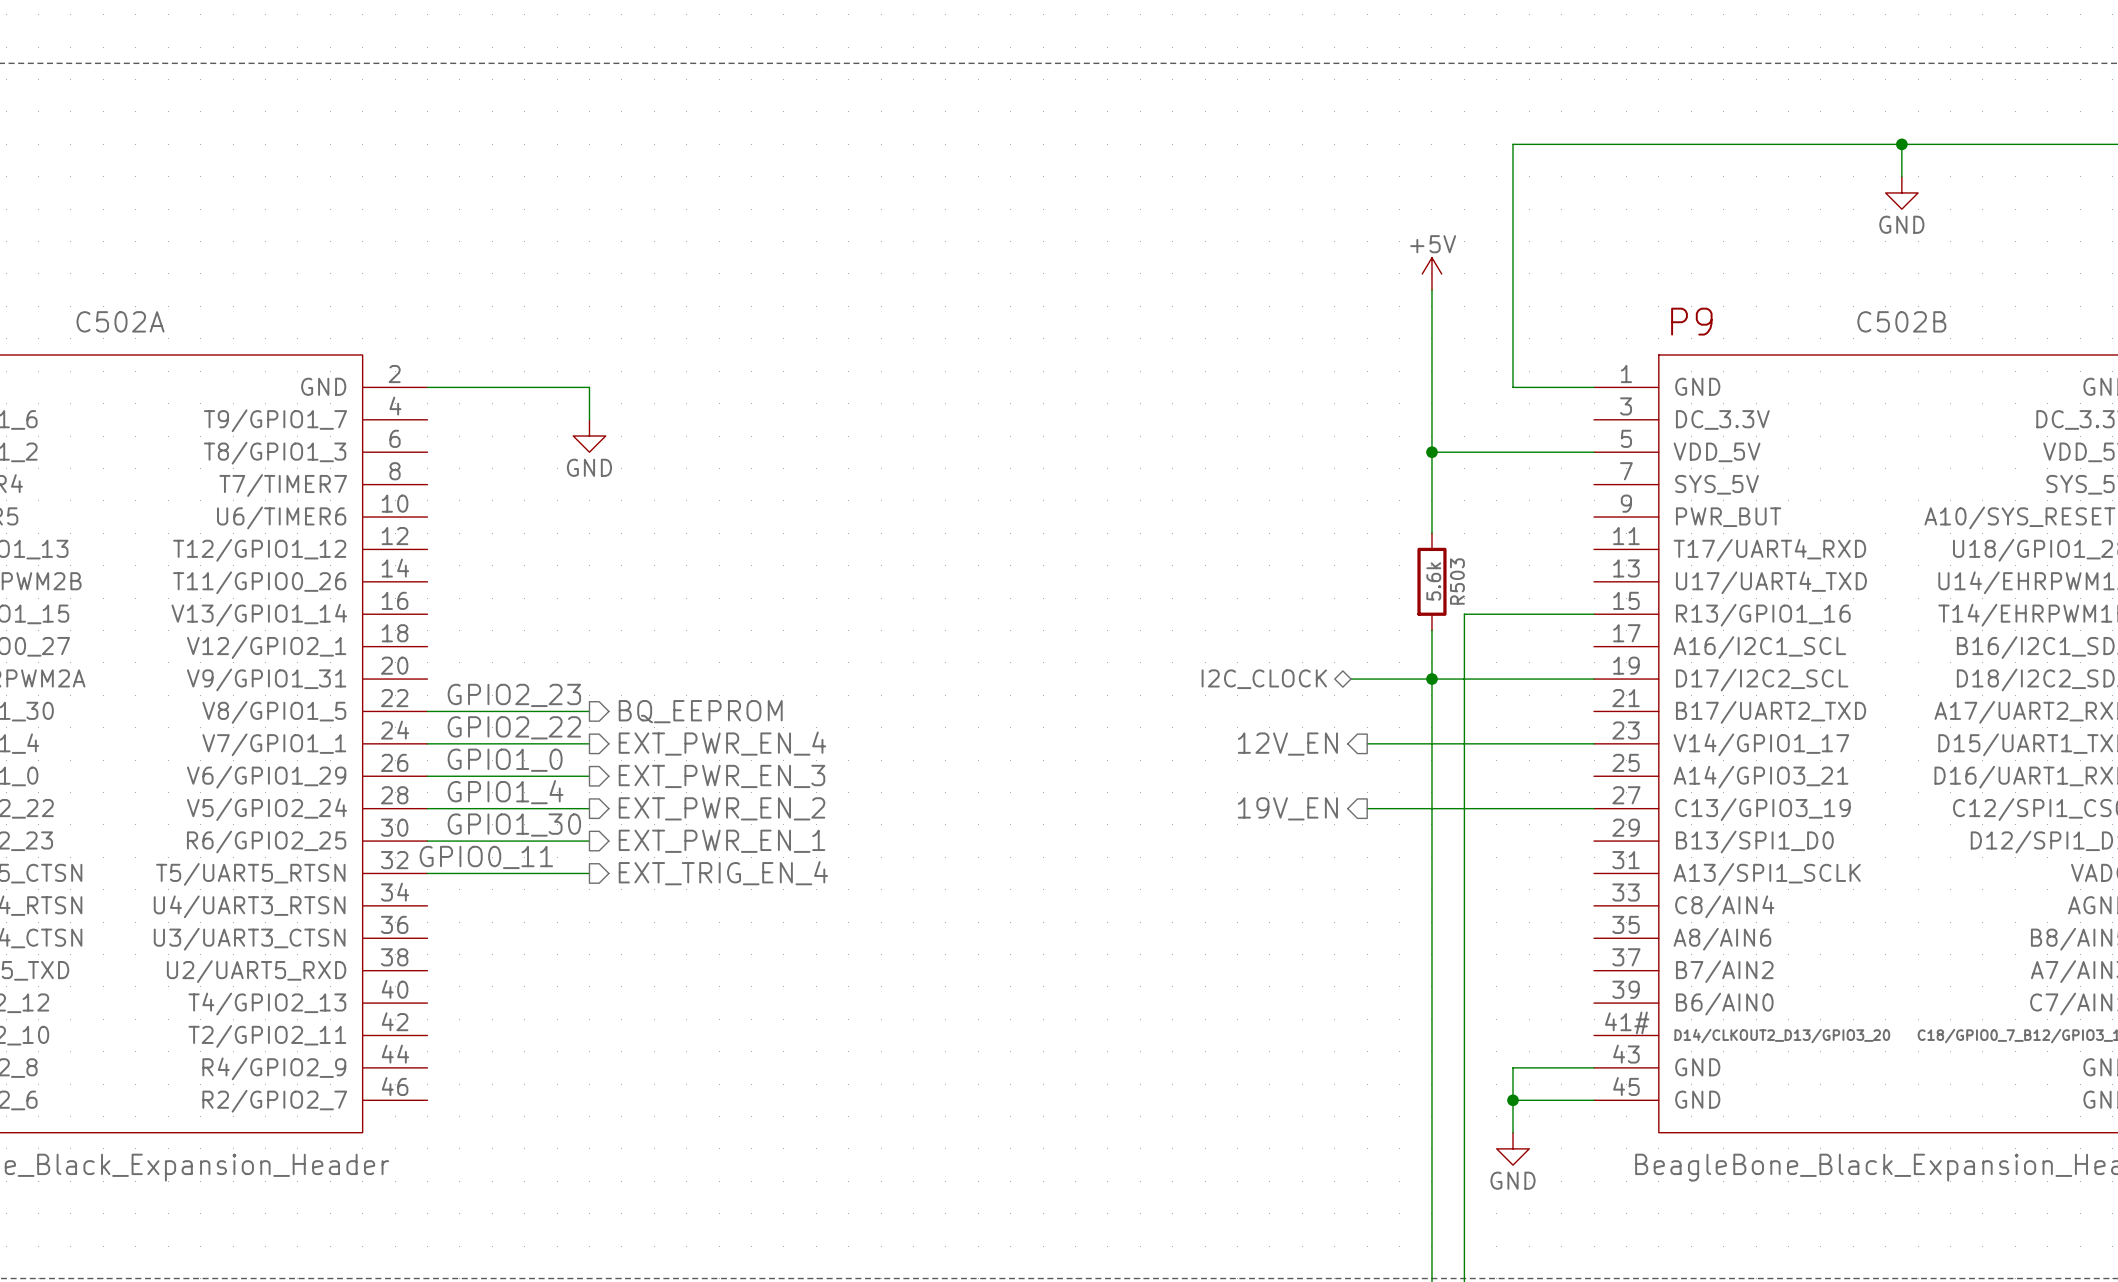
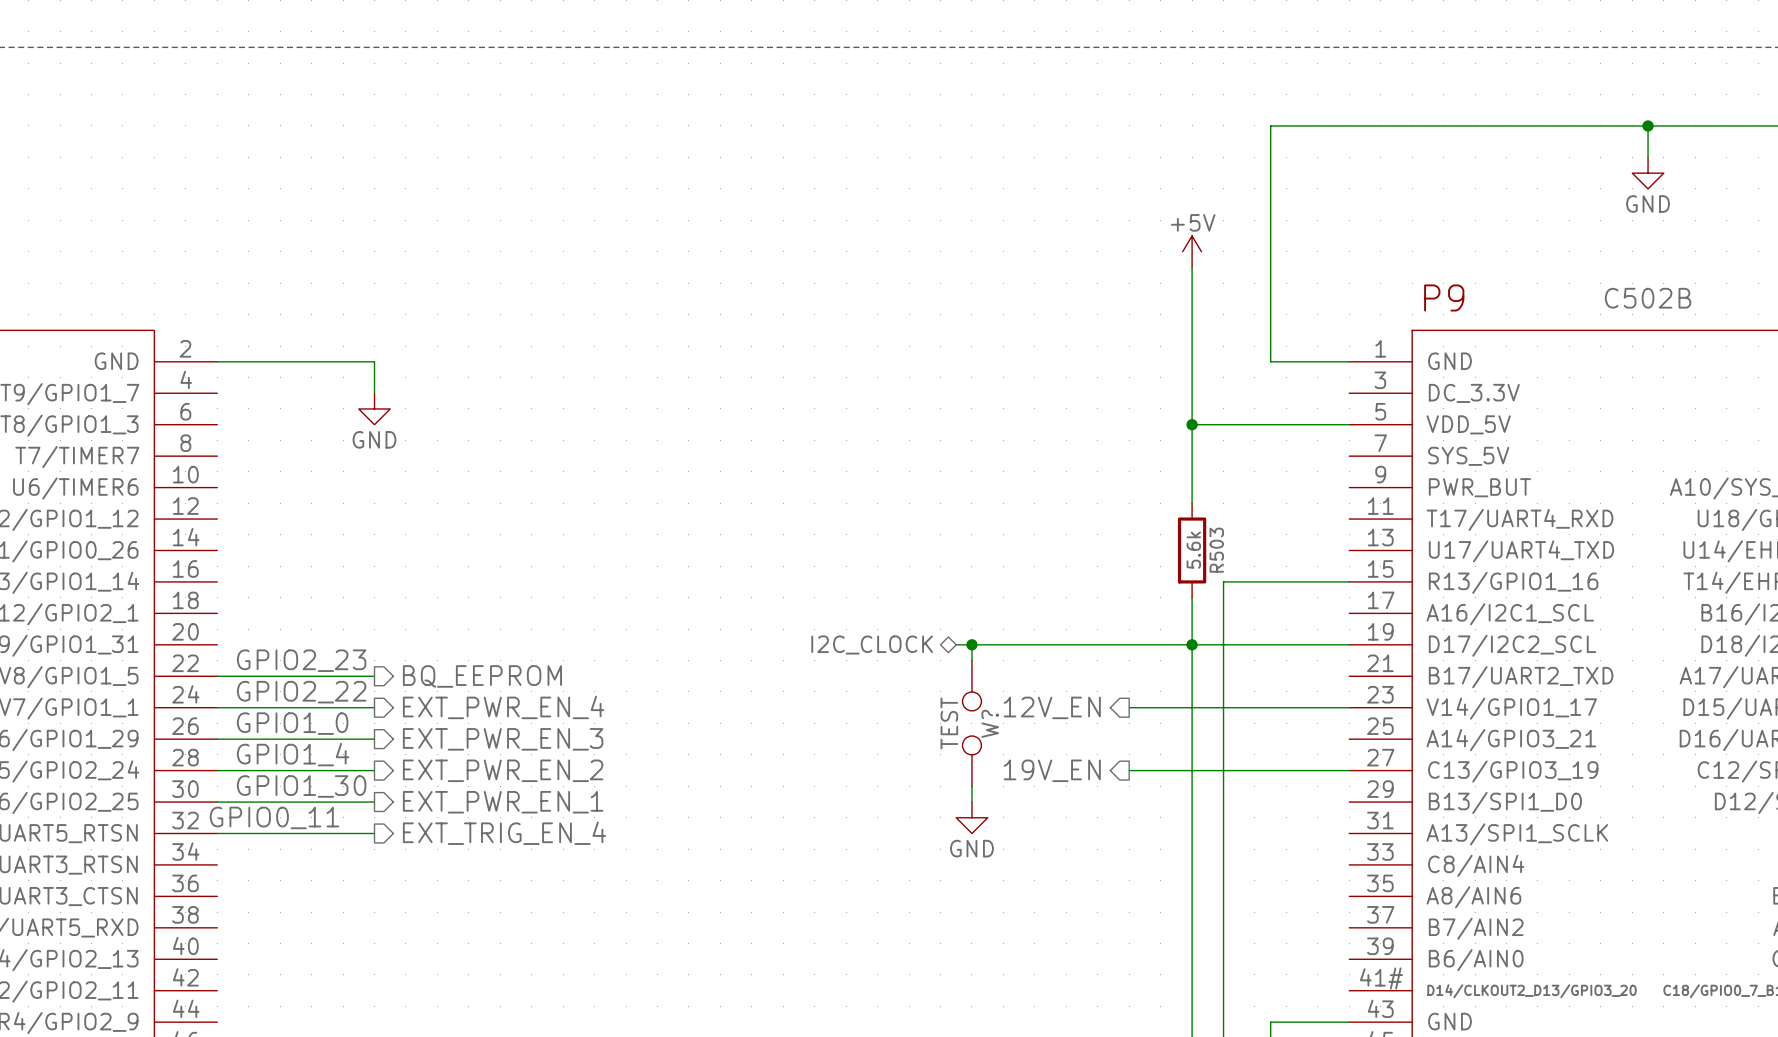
wire: none -> (956, 644) (1113, 644)
wire: none -> (971, 644) (971, 660)
junction: none -> (971, 644)
hierarchical label position: I2C_CLOCK (1264, 679) -> I2C_CLOCK (872, 644)
W?: none -> TEST (971, 723)
wire: none -> (971, 786) (971, 802)
power symbol: none -> GND (971, 817)

